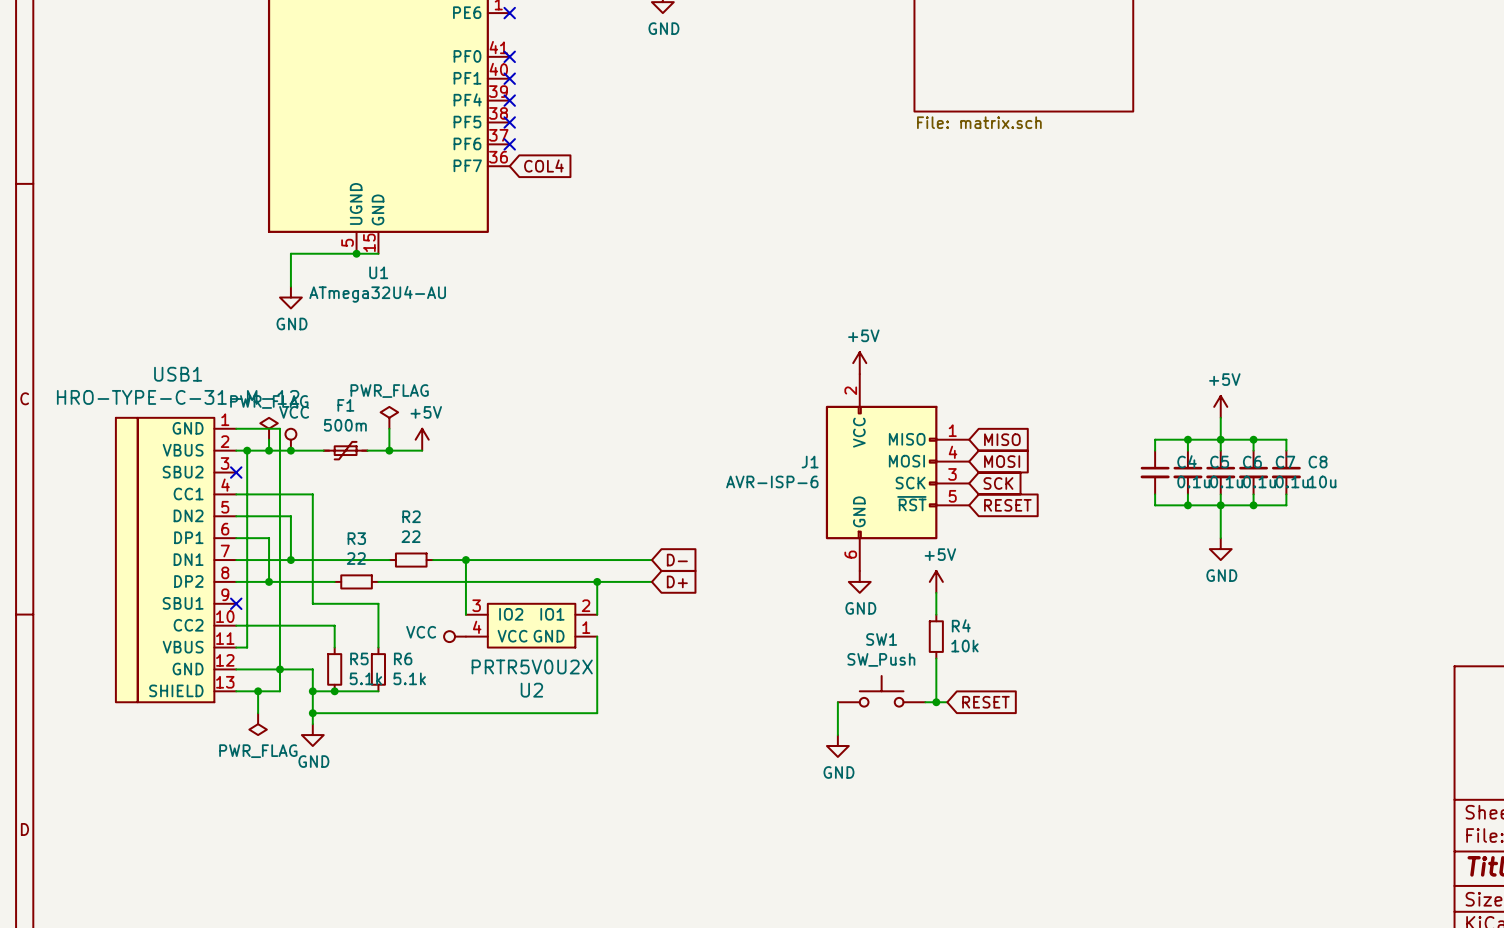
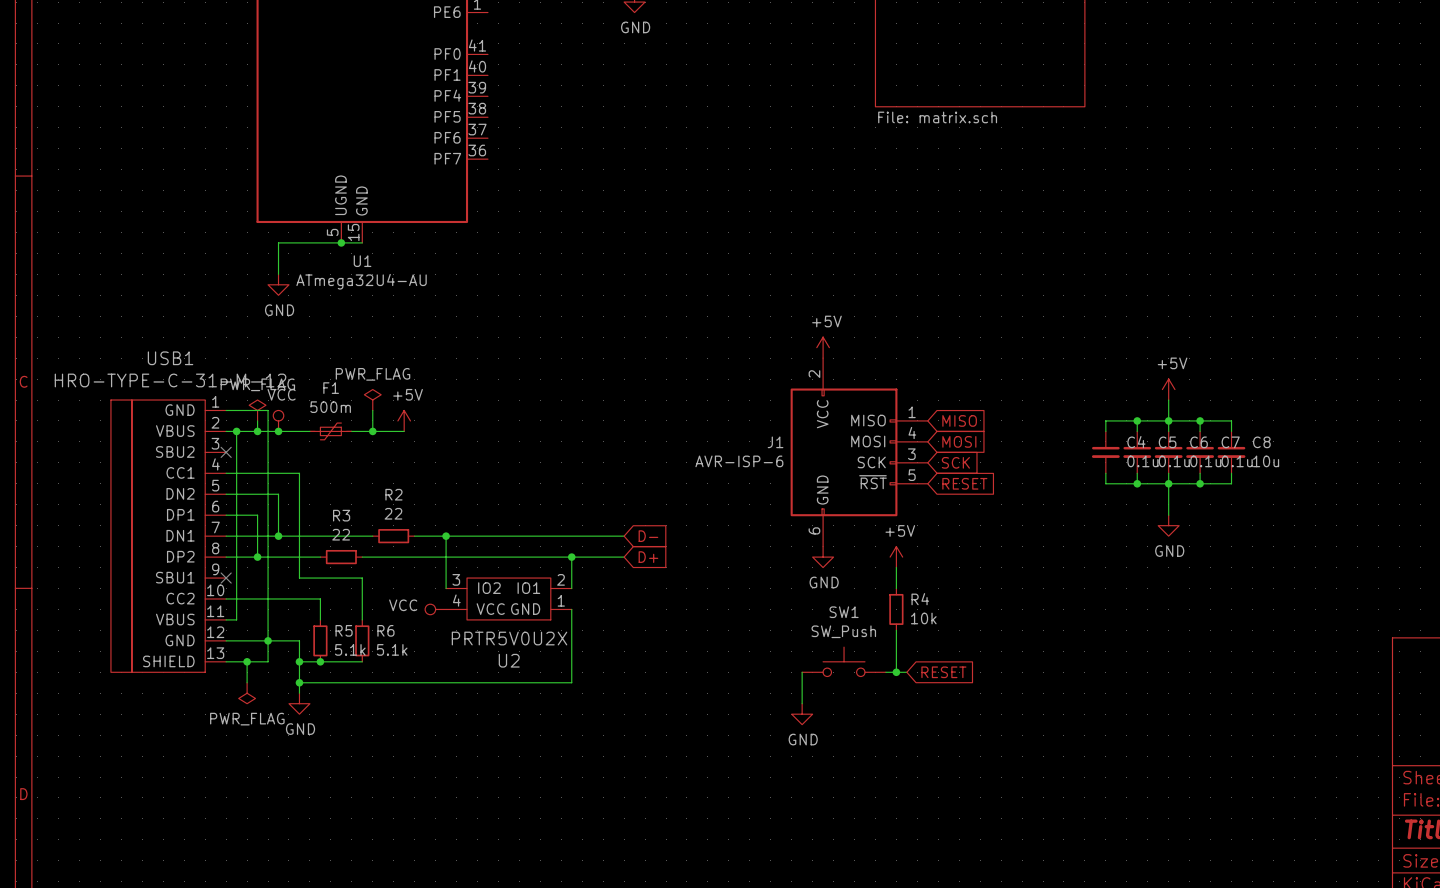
no-connect mark: (509, 13) -> none
no-connect mark: (509, 56) -> none
no-connect mark: (509, 78) -> none
no-connect mark: (509, 100) -> none
no-connect mark: (509, 122) -> none
no-connect mark: (509, 144) -> none
global label: COL4 (543, 165) -> none

